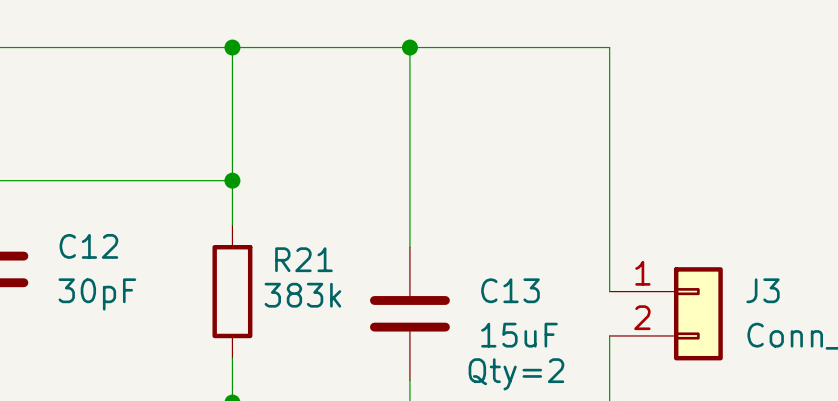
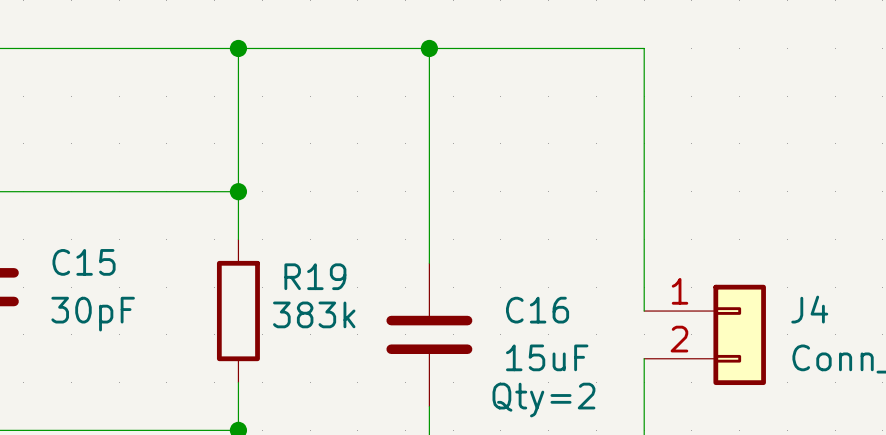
C12 name: C12 (88, 246) -> C15 (84, 262)
R21 name: R21 (303, 259) -> R19 (315, 276)
C13 name: C13 (510, 290) -> C16 (537, 310)
J3 name: J3 (763, 290) -> J4 (809, 309)

